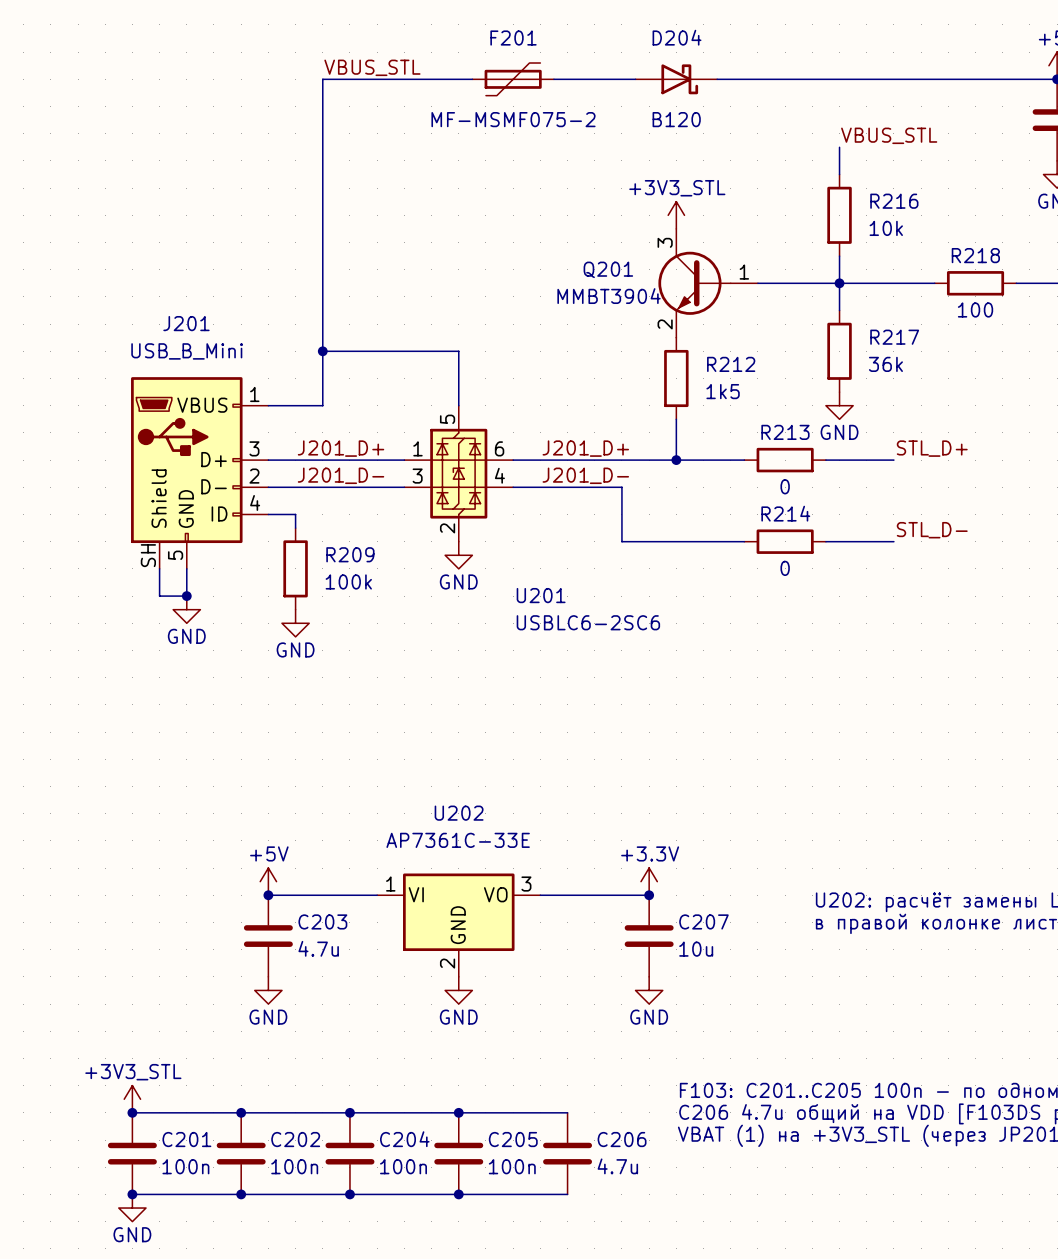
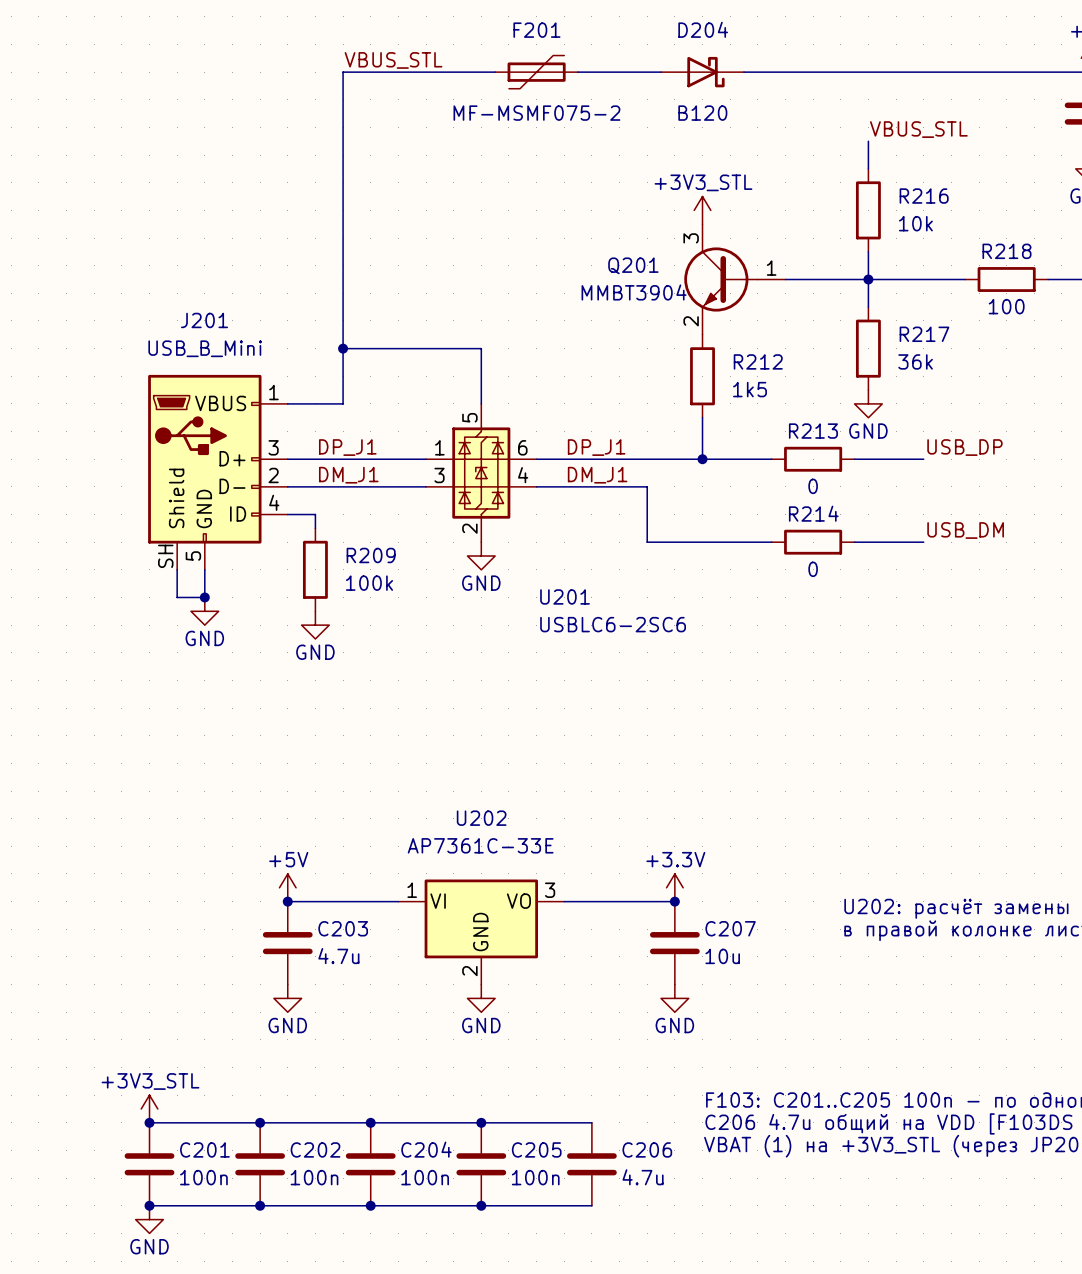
label: J201_D+ (341, 448) -> DP_J1 (347, 447)
label: J201_D+ (585, 448) -> DP_J1 (596, 447)
label: STL_D+ (932, 448) -> USB_DP (964, 447)
label: J201_D- (341, 475) -> DM_J1 (348, 475)
label: J201_D- (585, 475) -> DM_J1 (597, 475)
label: STL_D- (932, 530) -> USB_DM (965, 530)

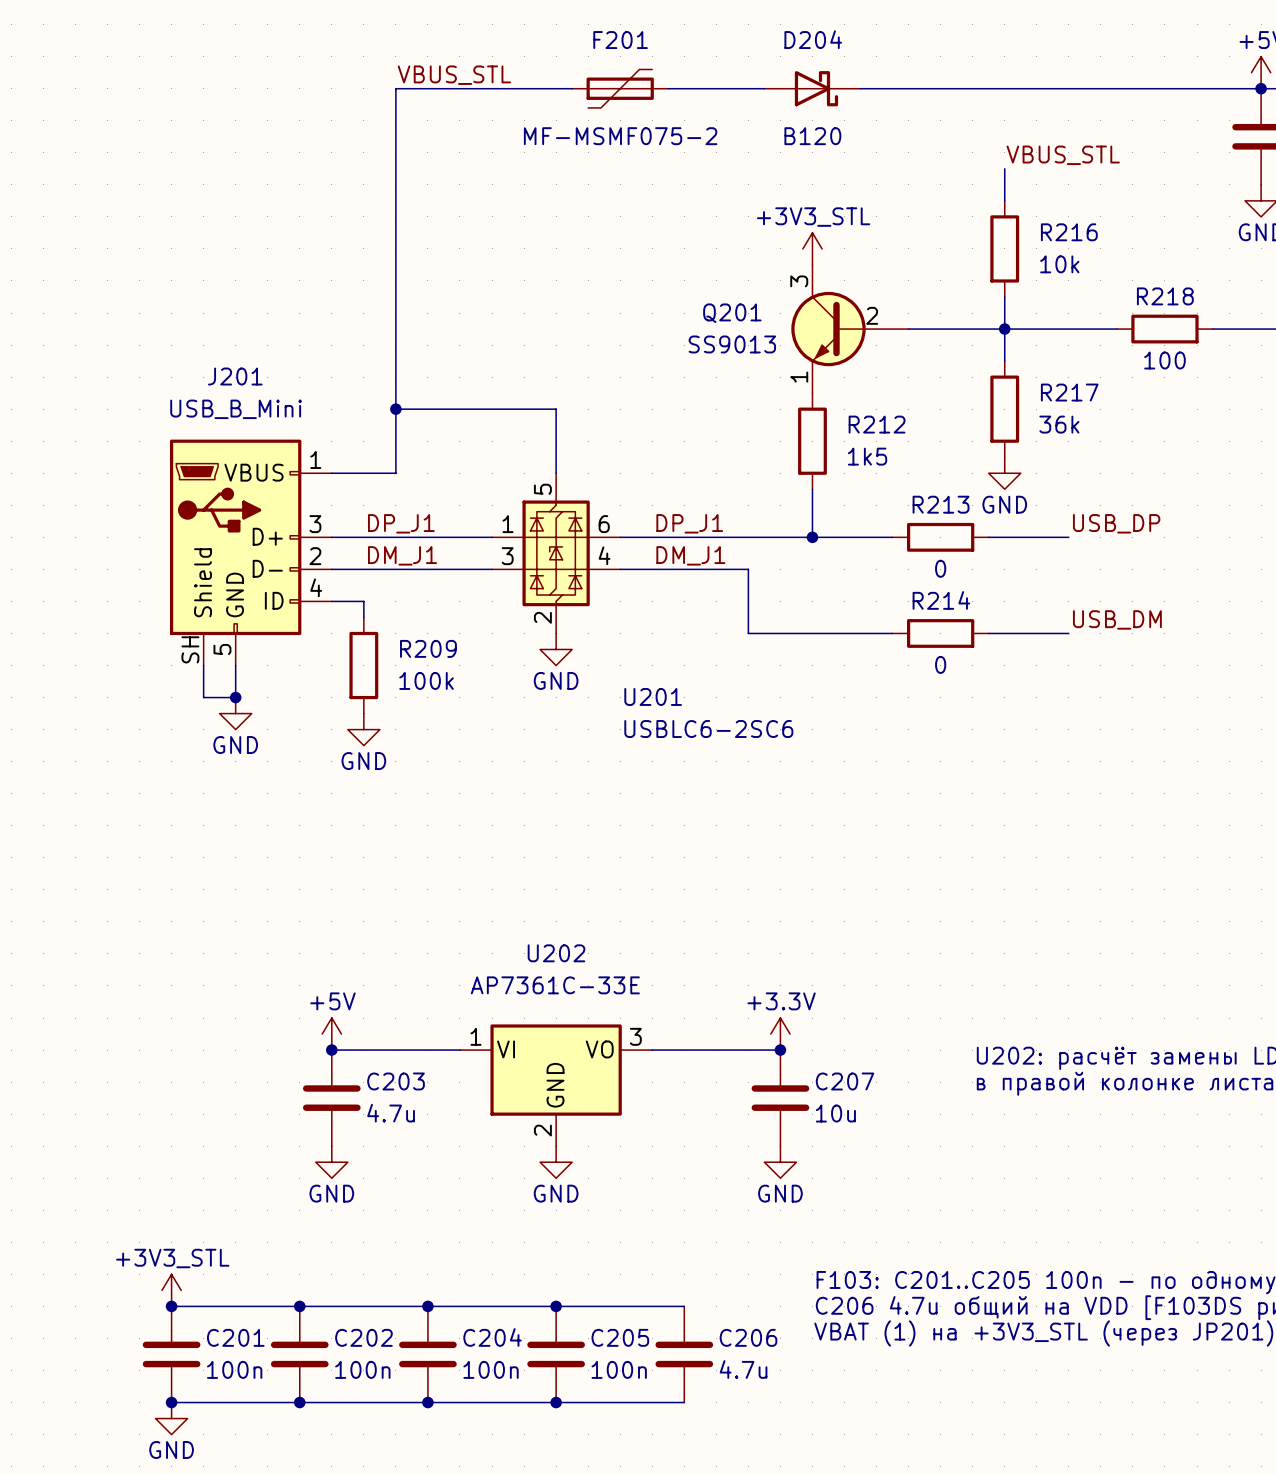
Q201 symbol: [684, 224, 786, 335] -> [791, 264, 909, 394]
Q201 value: MMBT3904 (634, 292) -> SS9013 (732, 344)

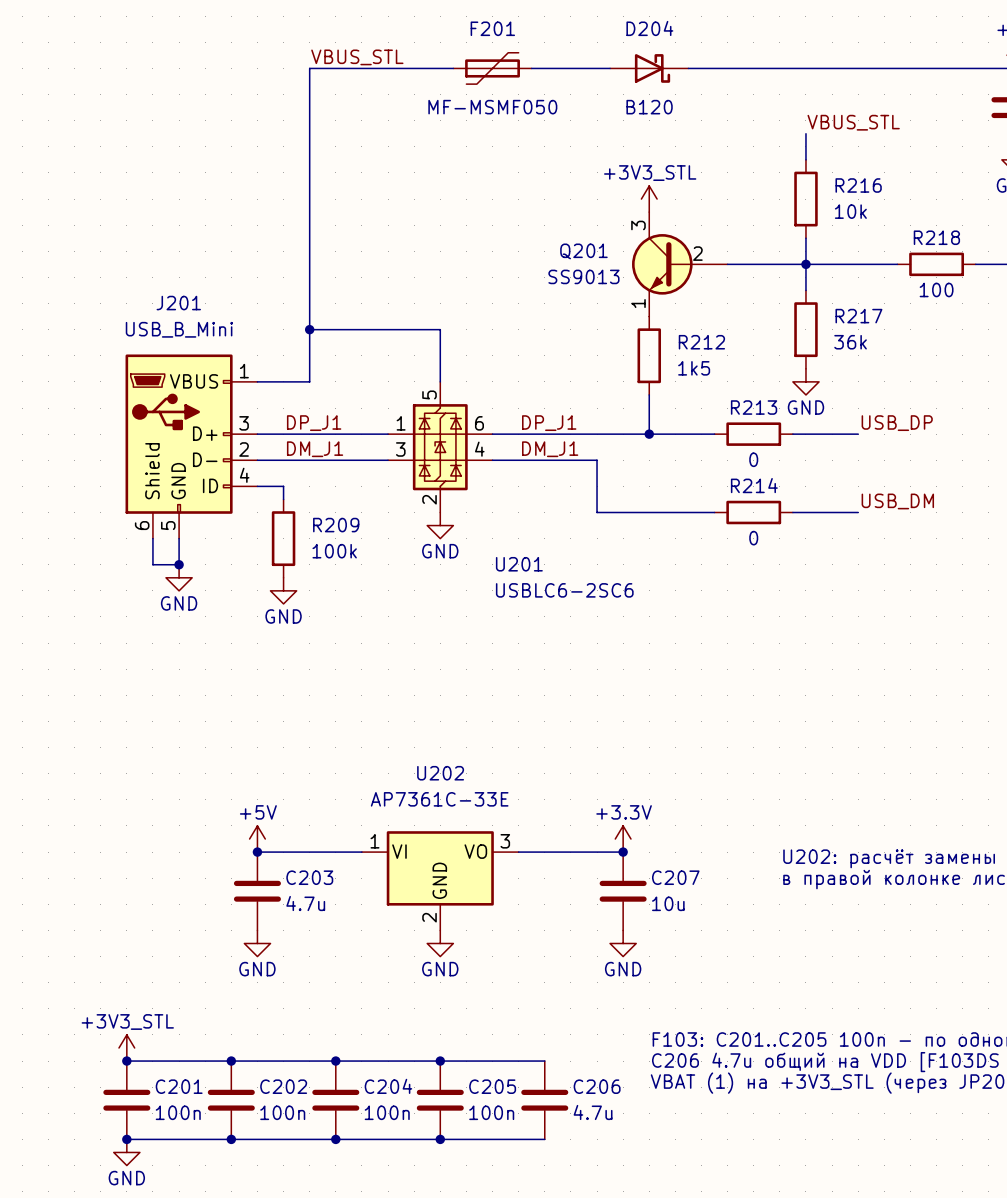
F201 value: MF-MSMF075-2 (620, 136) -> MF-MSMF050 (492, 107)
J201 pin number: SH (190, 649) -> 6 (142, 525)

